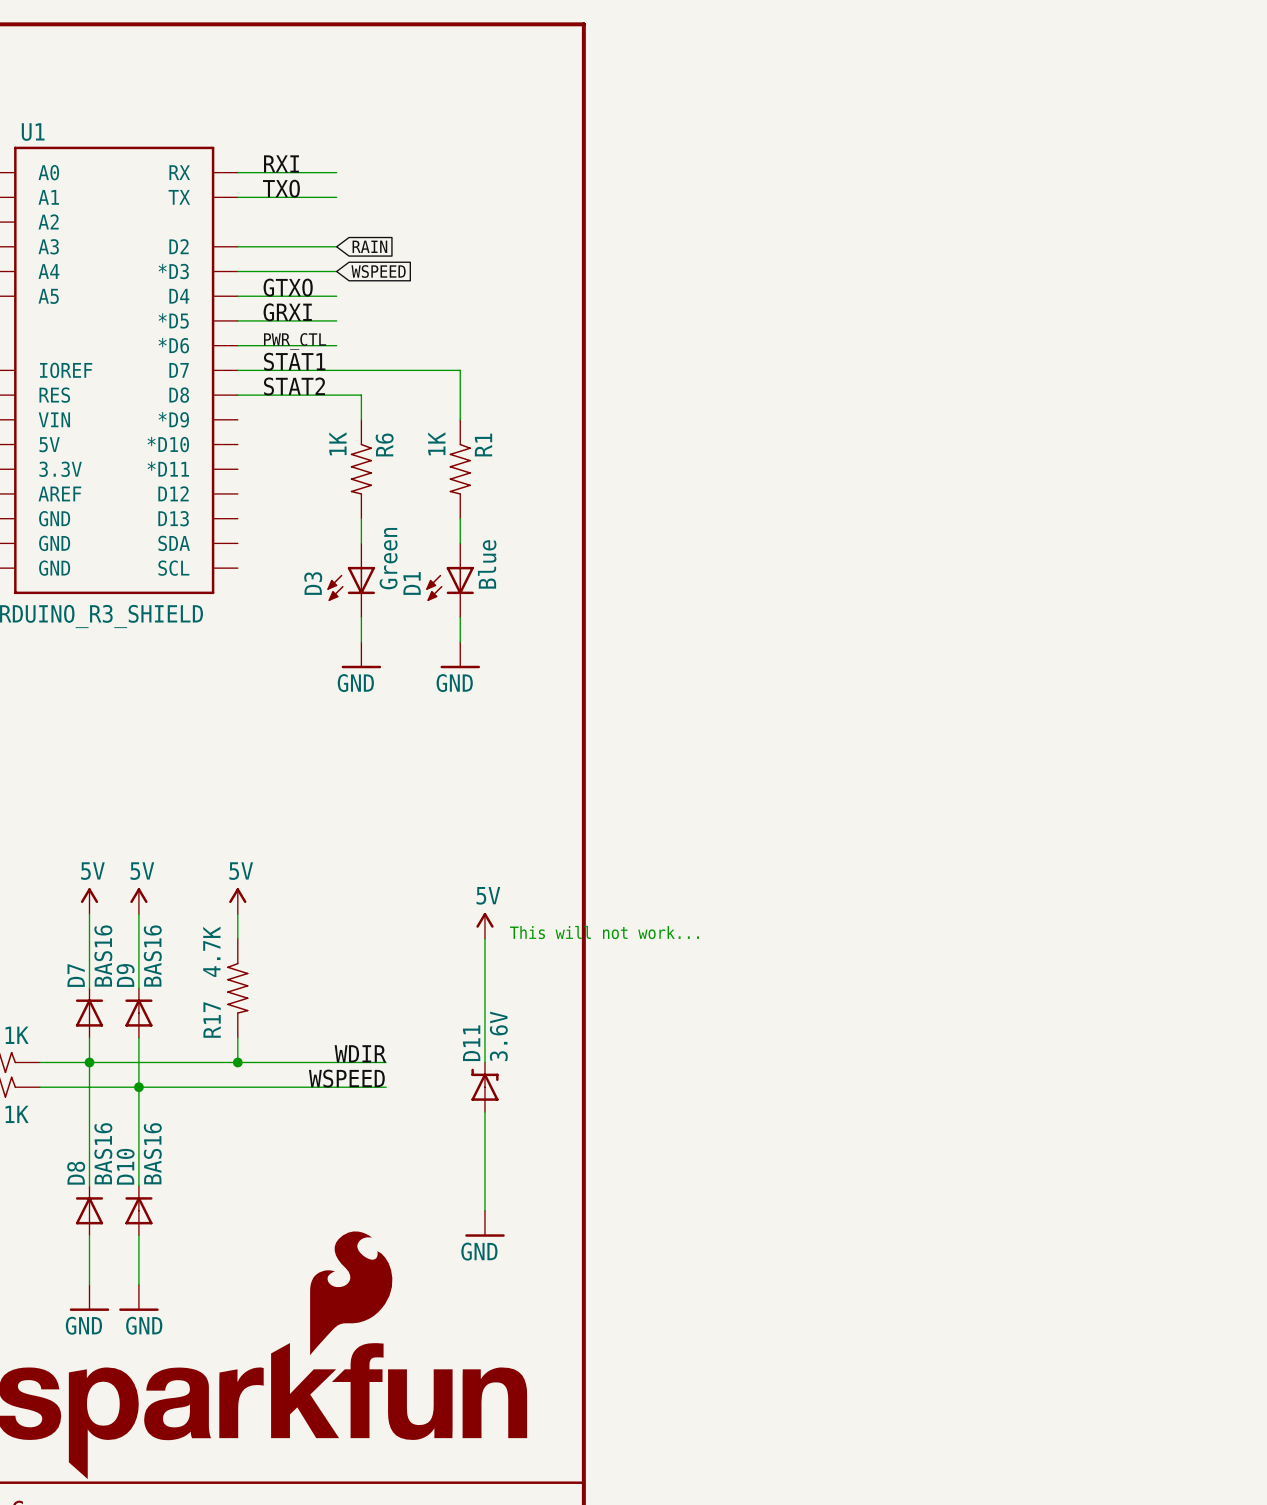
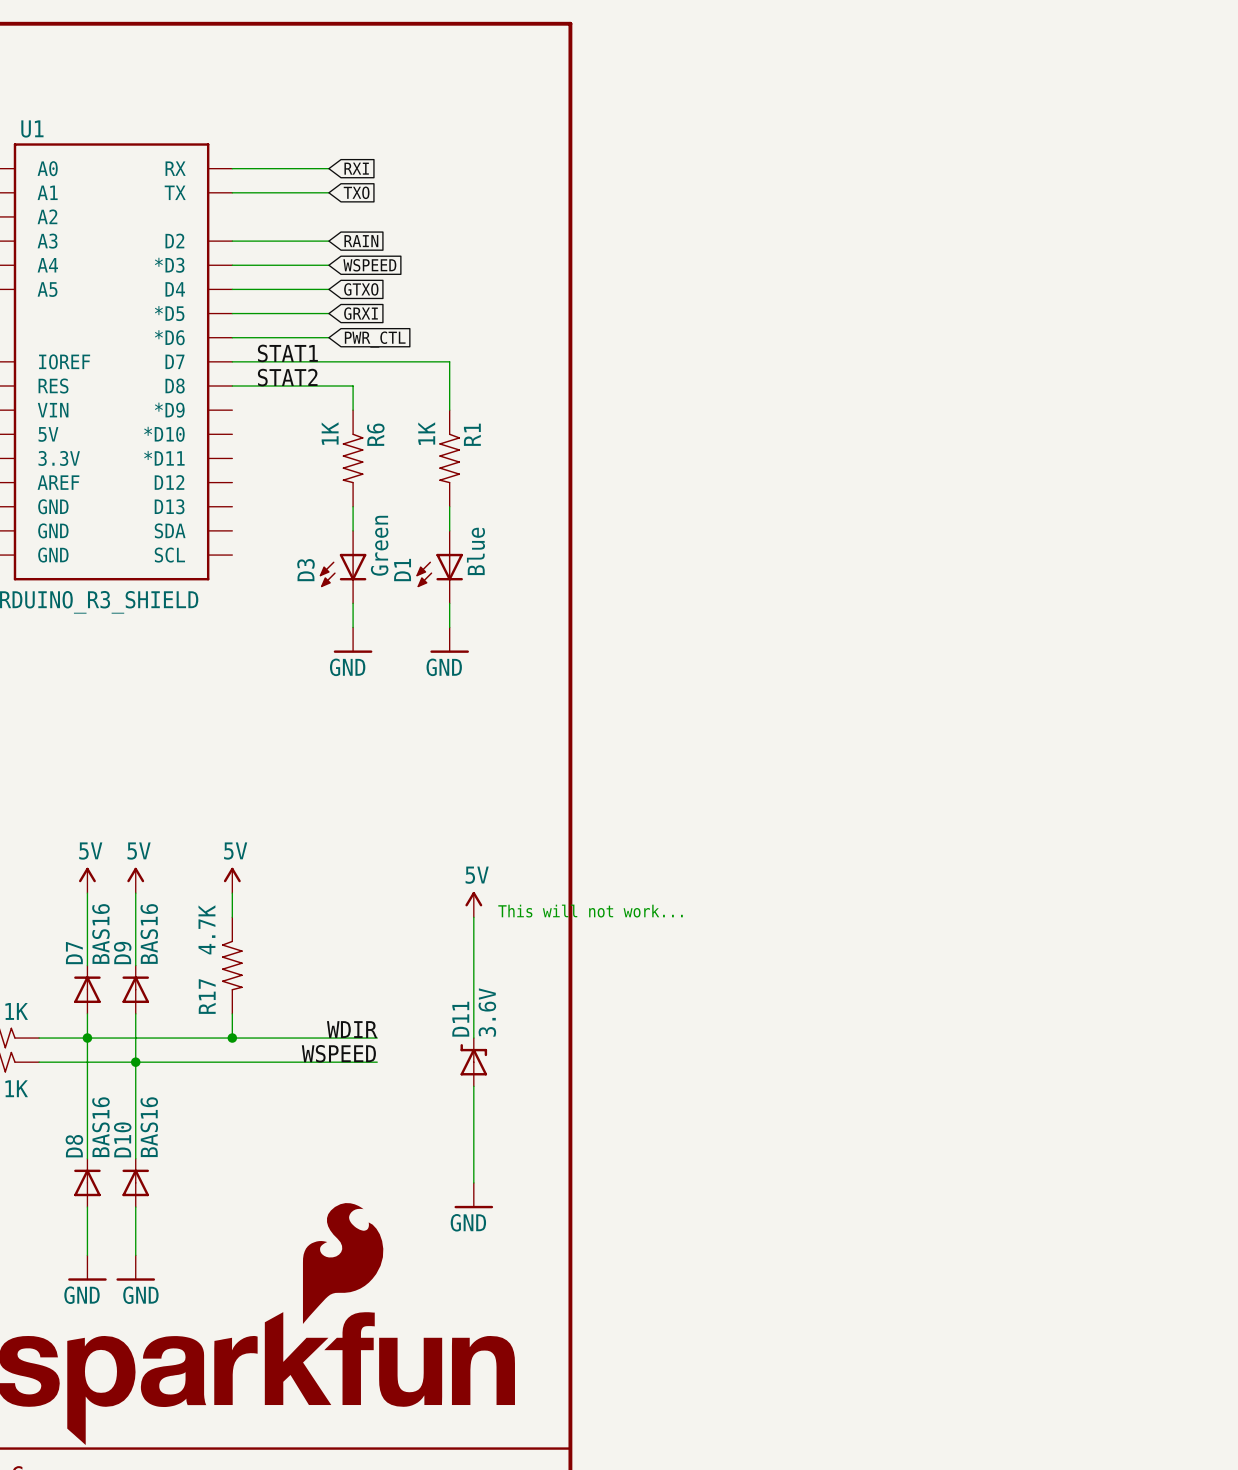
label: RXI (281, 163) -> none
global label: none -> RXI (356, 168)
label: TXO (281, 188) -> none
global label: none -> TXO (356, 192)
label: GTXO (288, 287) -> none
global label: none -> GTXO (361, 289)
label: GRXI (287, 312) -> none
global label: none -> GRXI (360, 313)
label: PWR_CTL (295, 341) -> none
global label: none -> PWR_CTL (375, 339)

